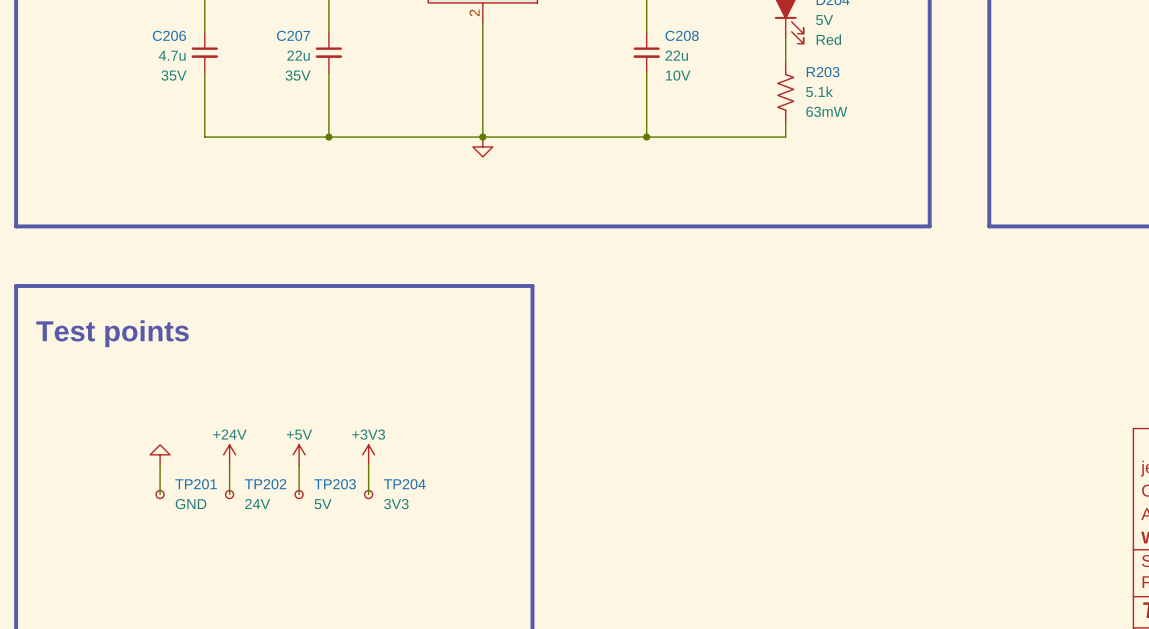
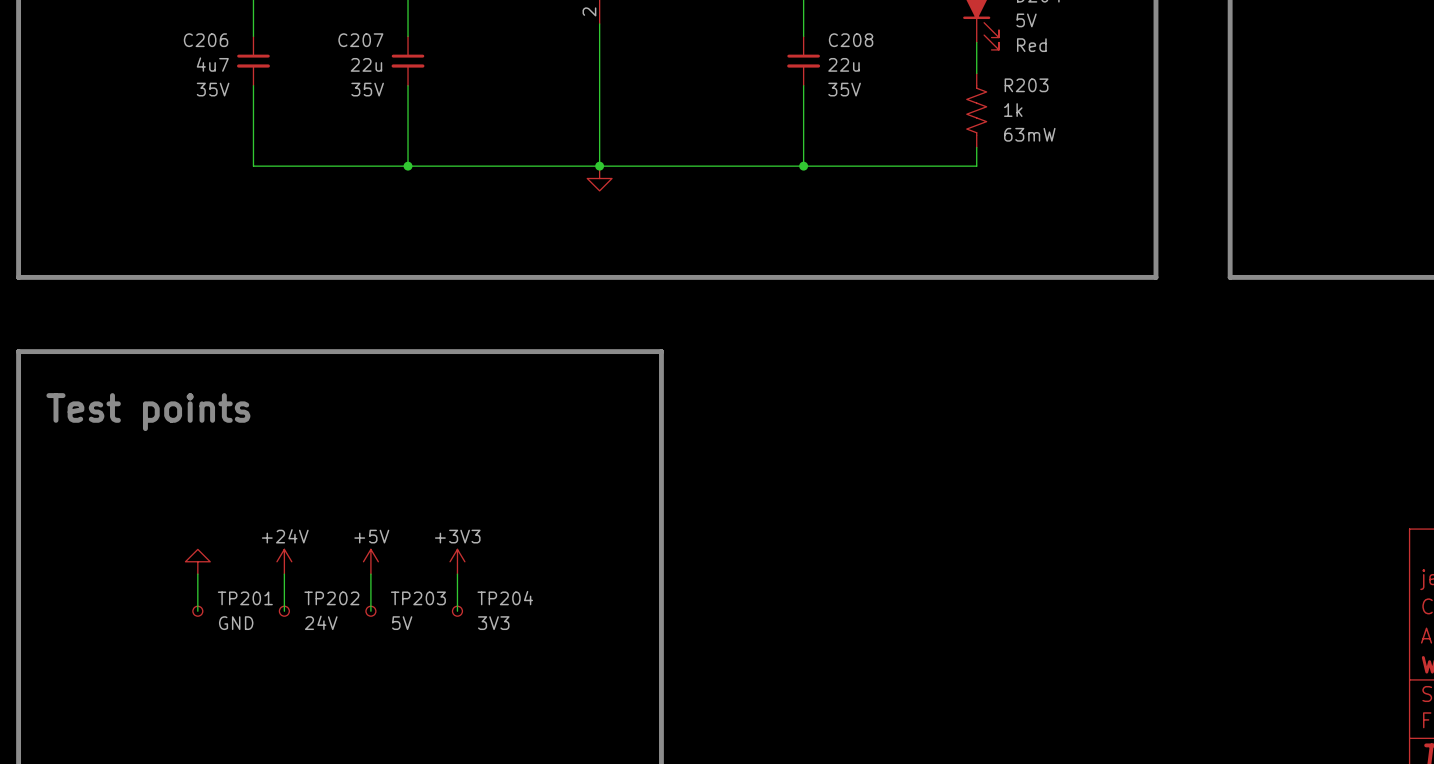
C206 value: 4.7u (172, 55) -> 4u7 (212, 64)
C208 text: 10V (678, 75) -> 35V (844, 89)
R203 value: 5.1k (819, 91) -> 1k (1013, 110)

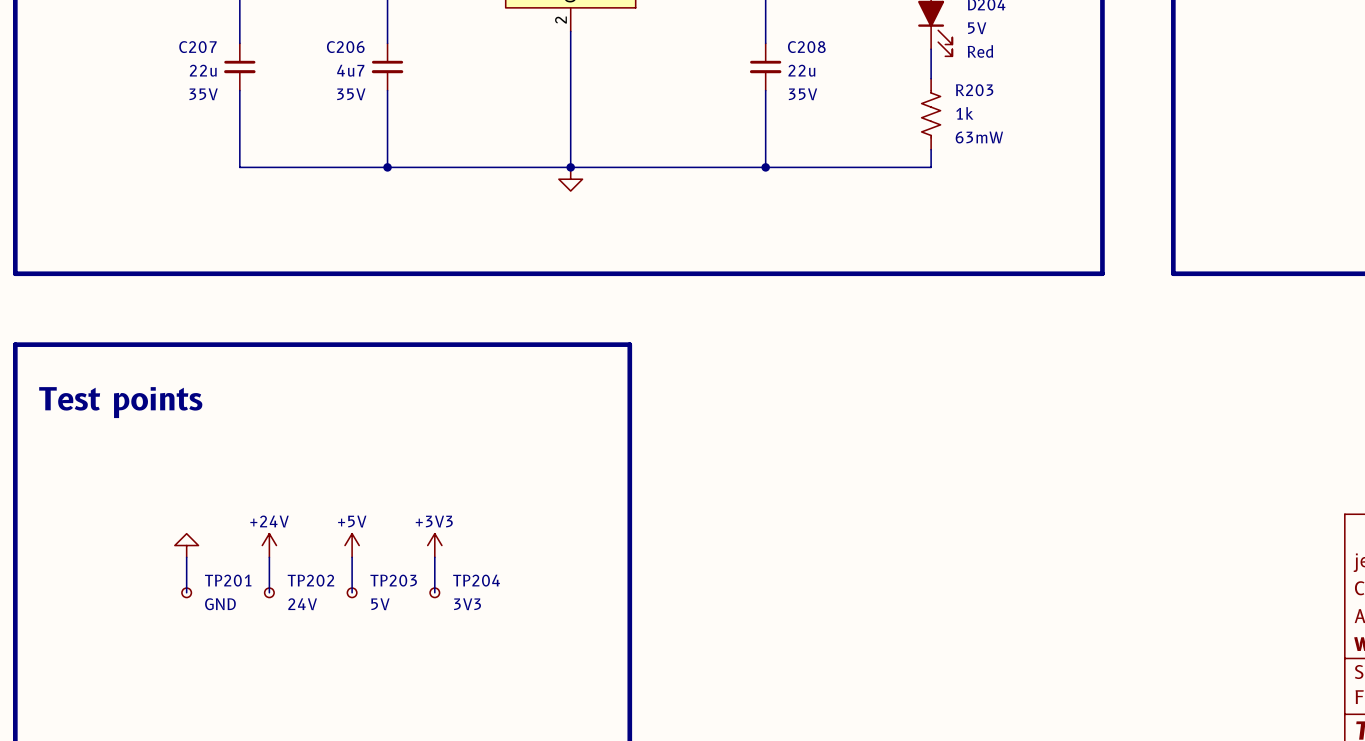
C206 name: C206 (206, 40) -> C207 (197, 47)
C207 name: C207 (360, 40) -> C206 (345, 47)
C206 value: 4u7 (212, 64) -> 22u (203, 70)
C207 value: 22u (366, 64) -> 4u7 (350, 70)

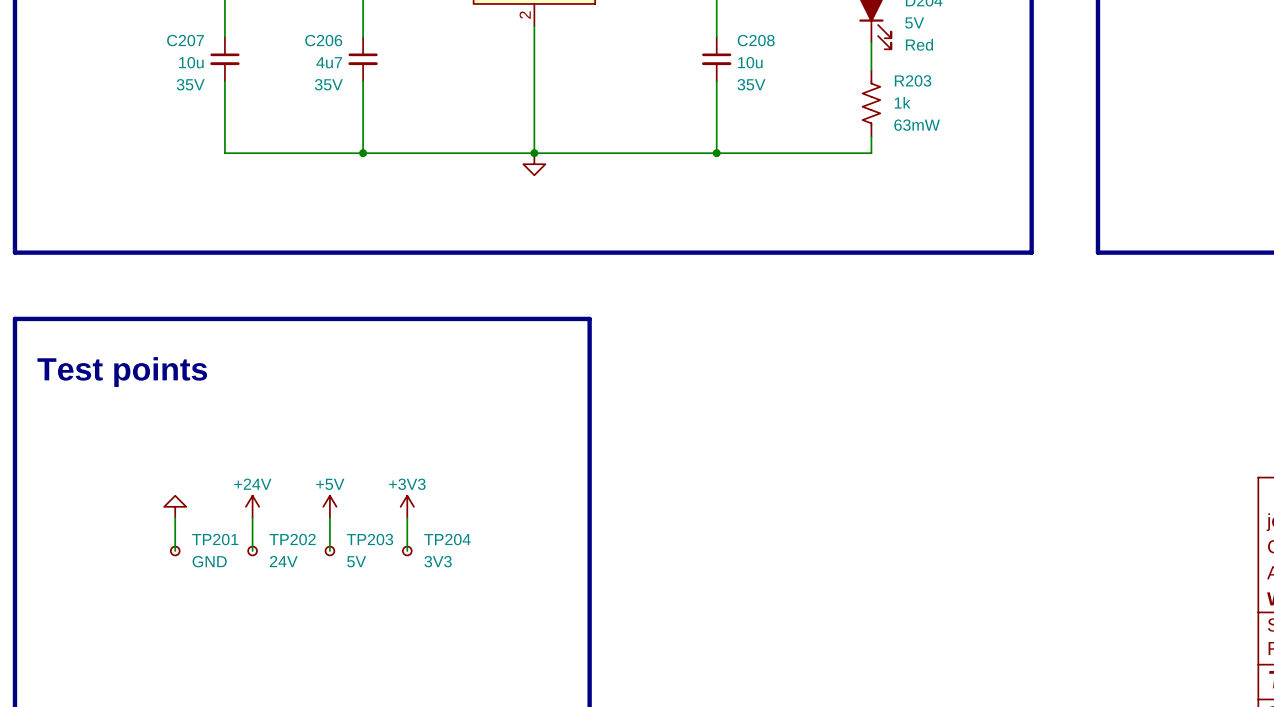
C207 value: 22u (203, 70) -> 10u (191, 62)
C208 value: 22u (801, 70) -> 10u (750, 62)

